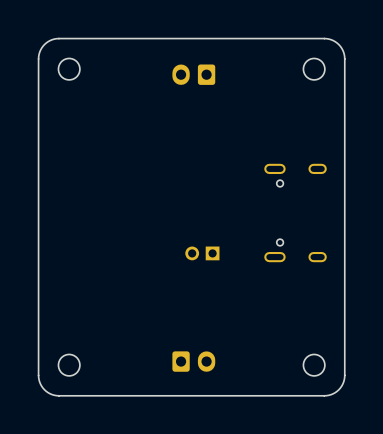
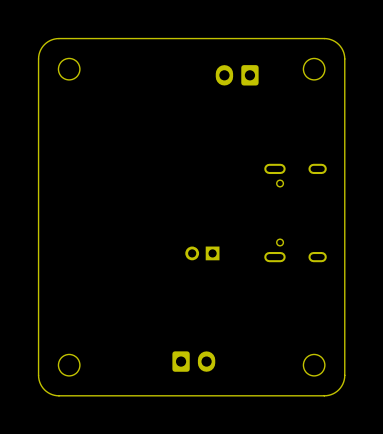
part position: (193, 74) -> (237, 75)

